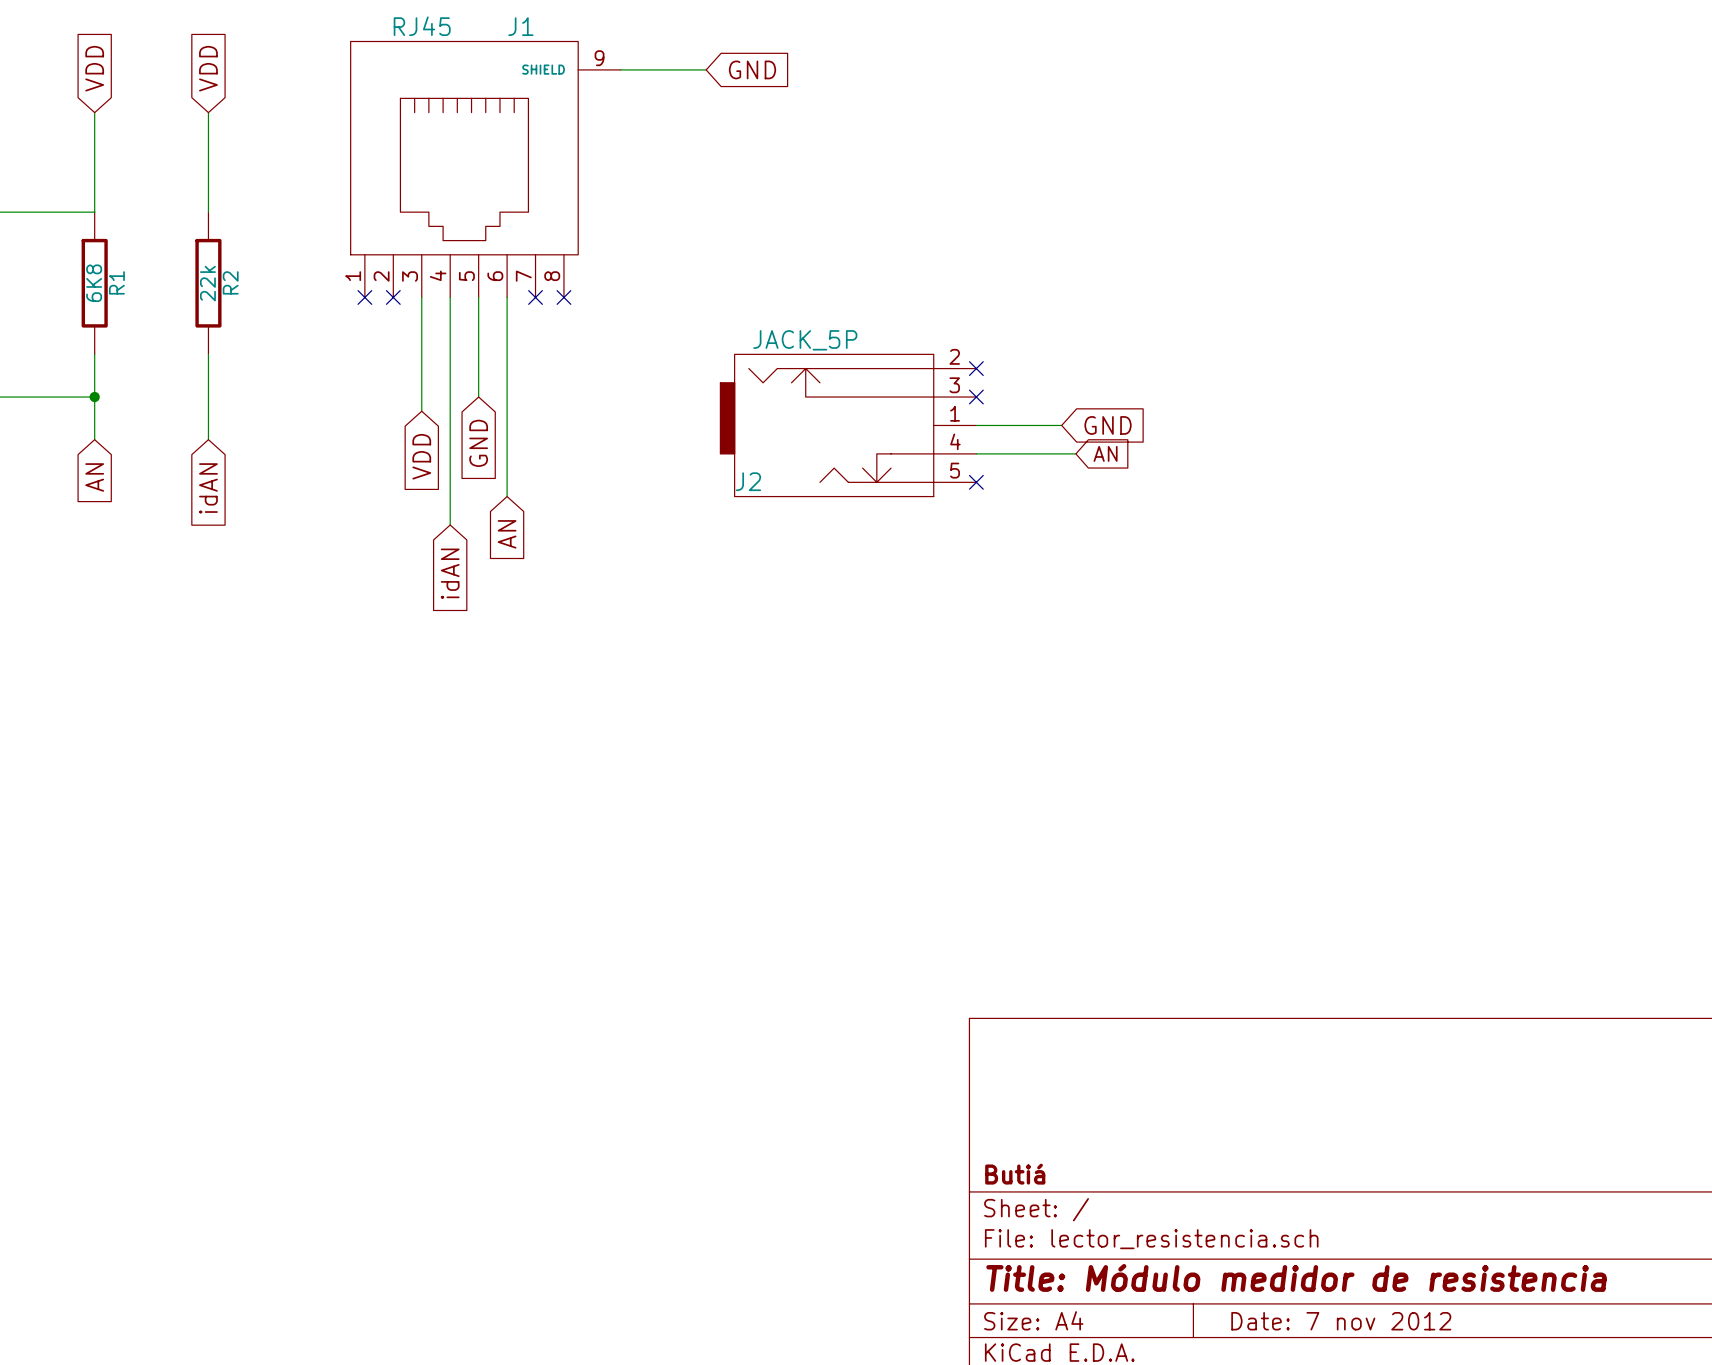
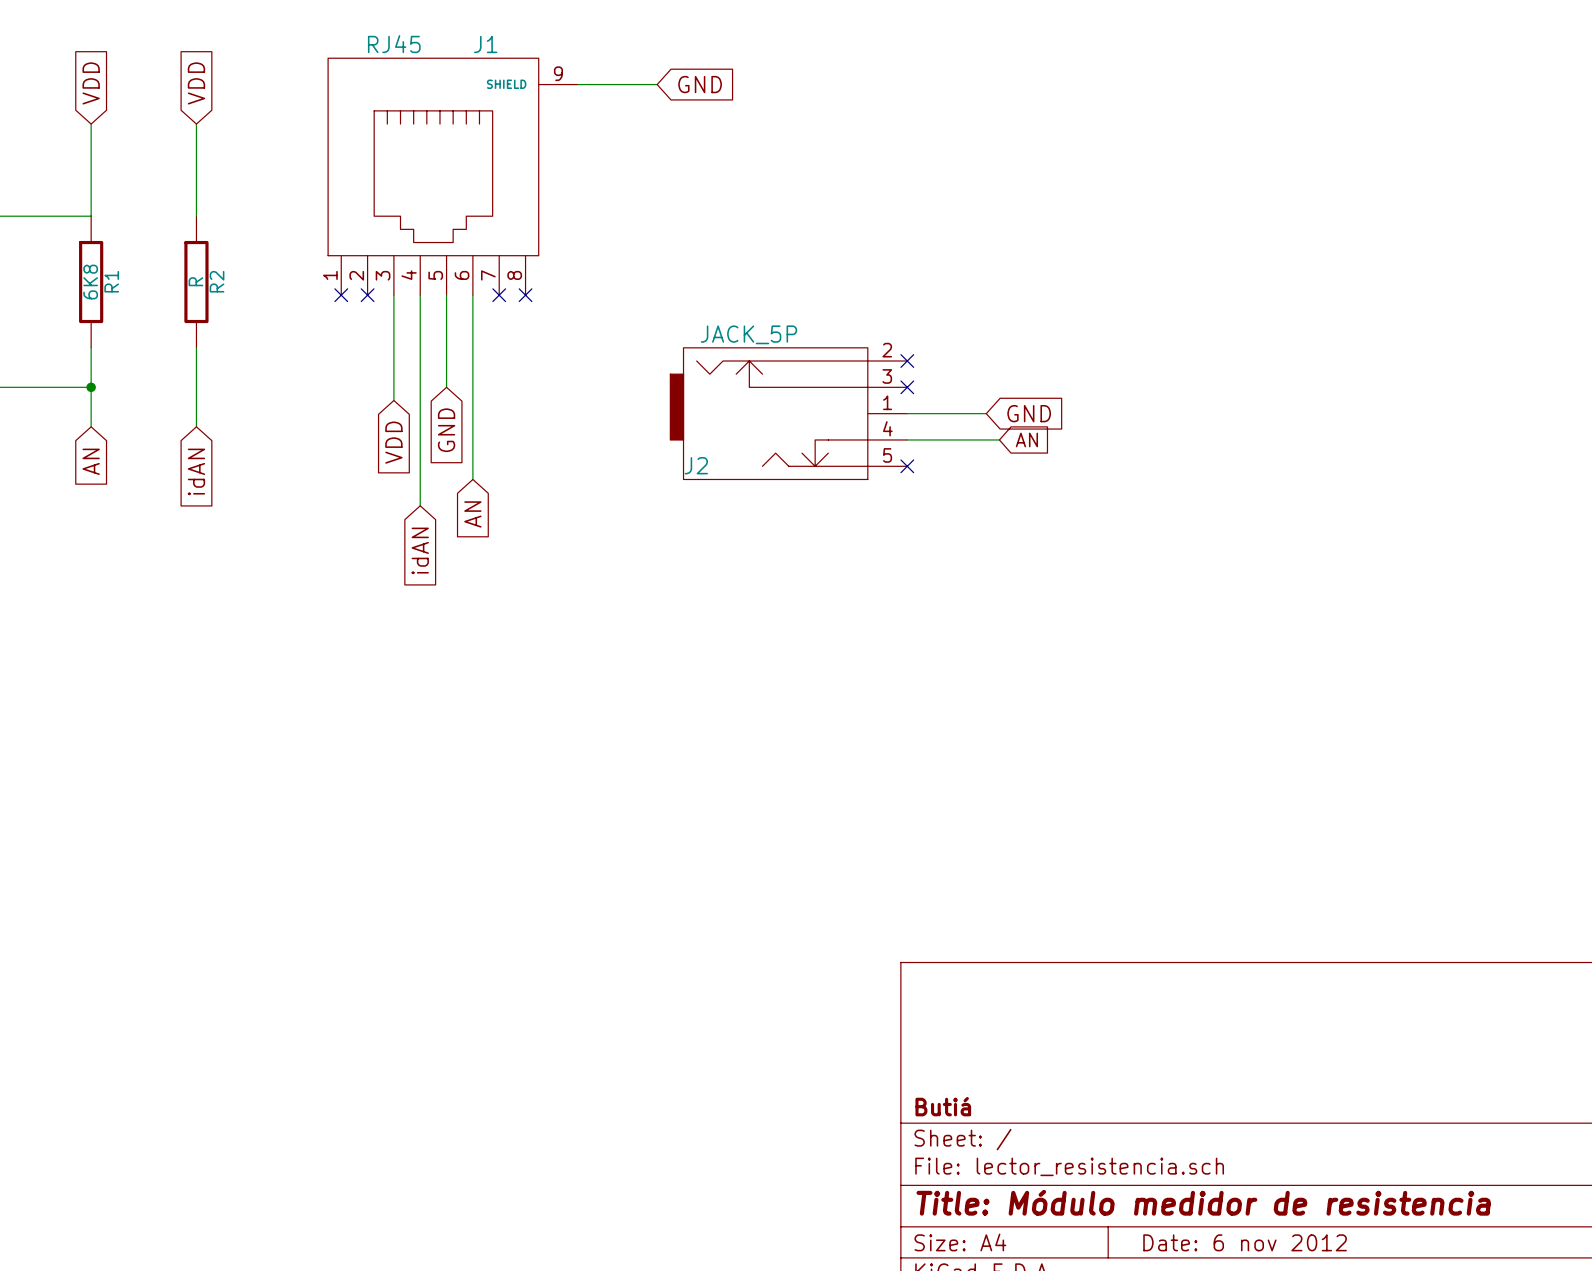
R2 value: 22k (207, 283) -> R (195, 281)
title block: Date: 7 nov 2012 (1341, 1321) -> Date: 6 nov 2012 (1245, 1242)

